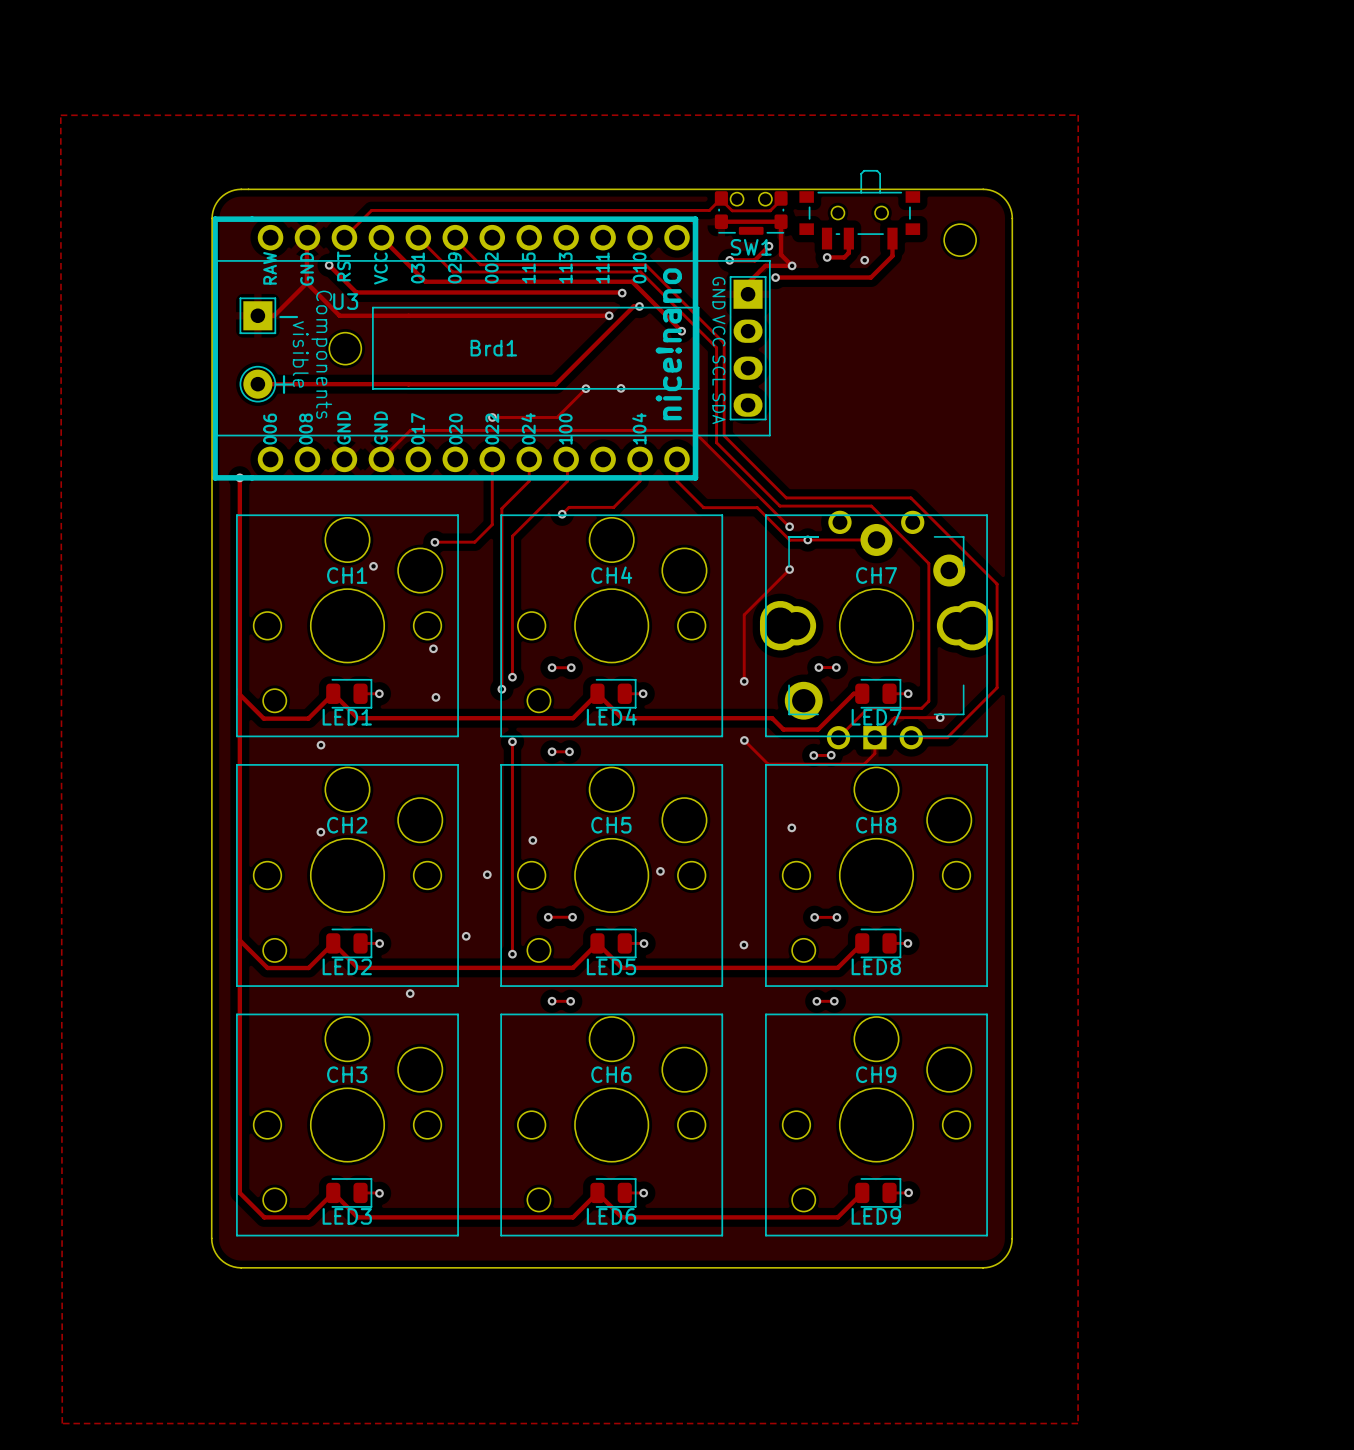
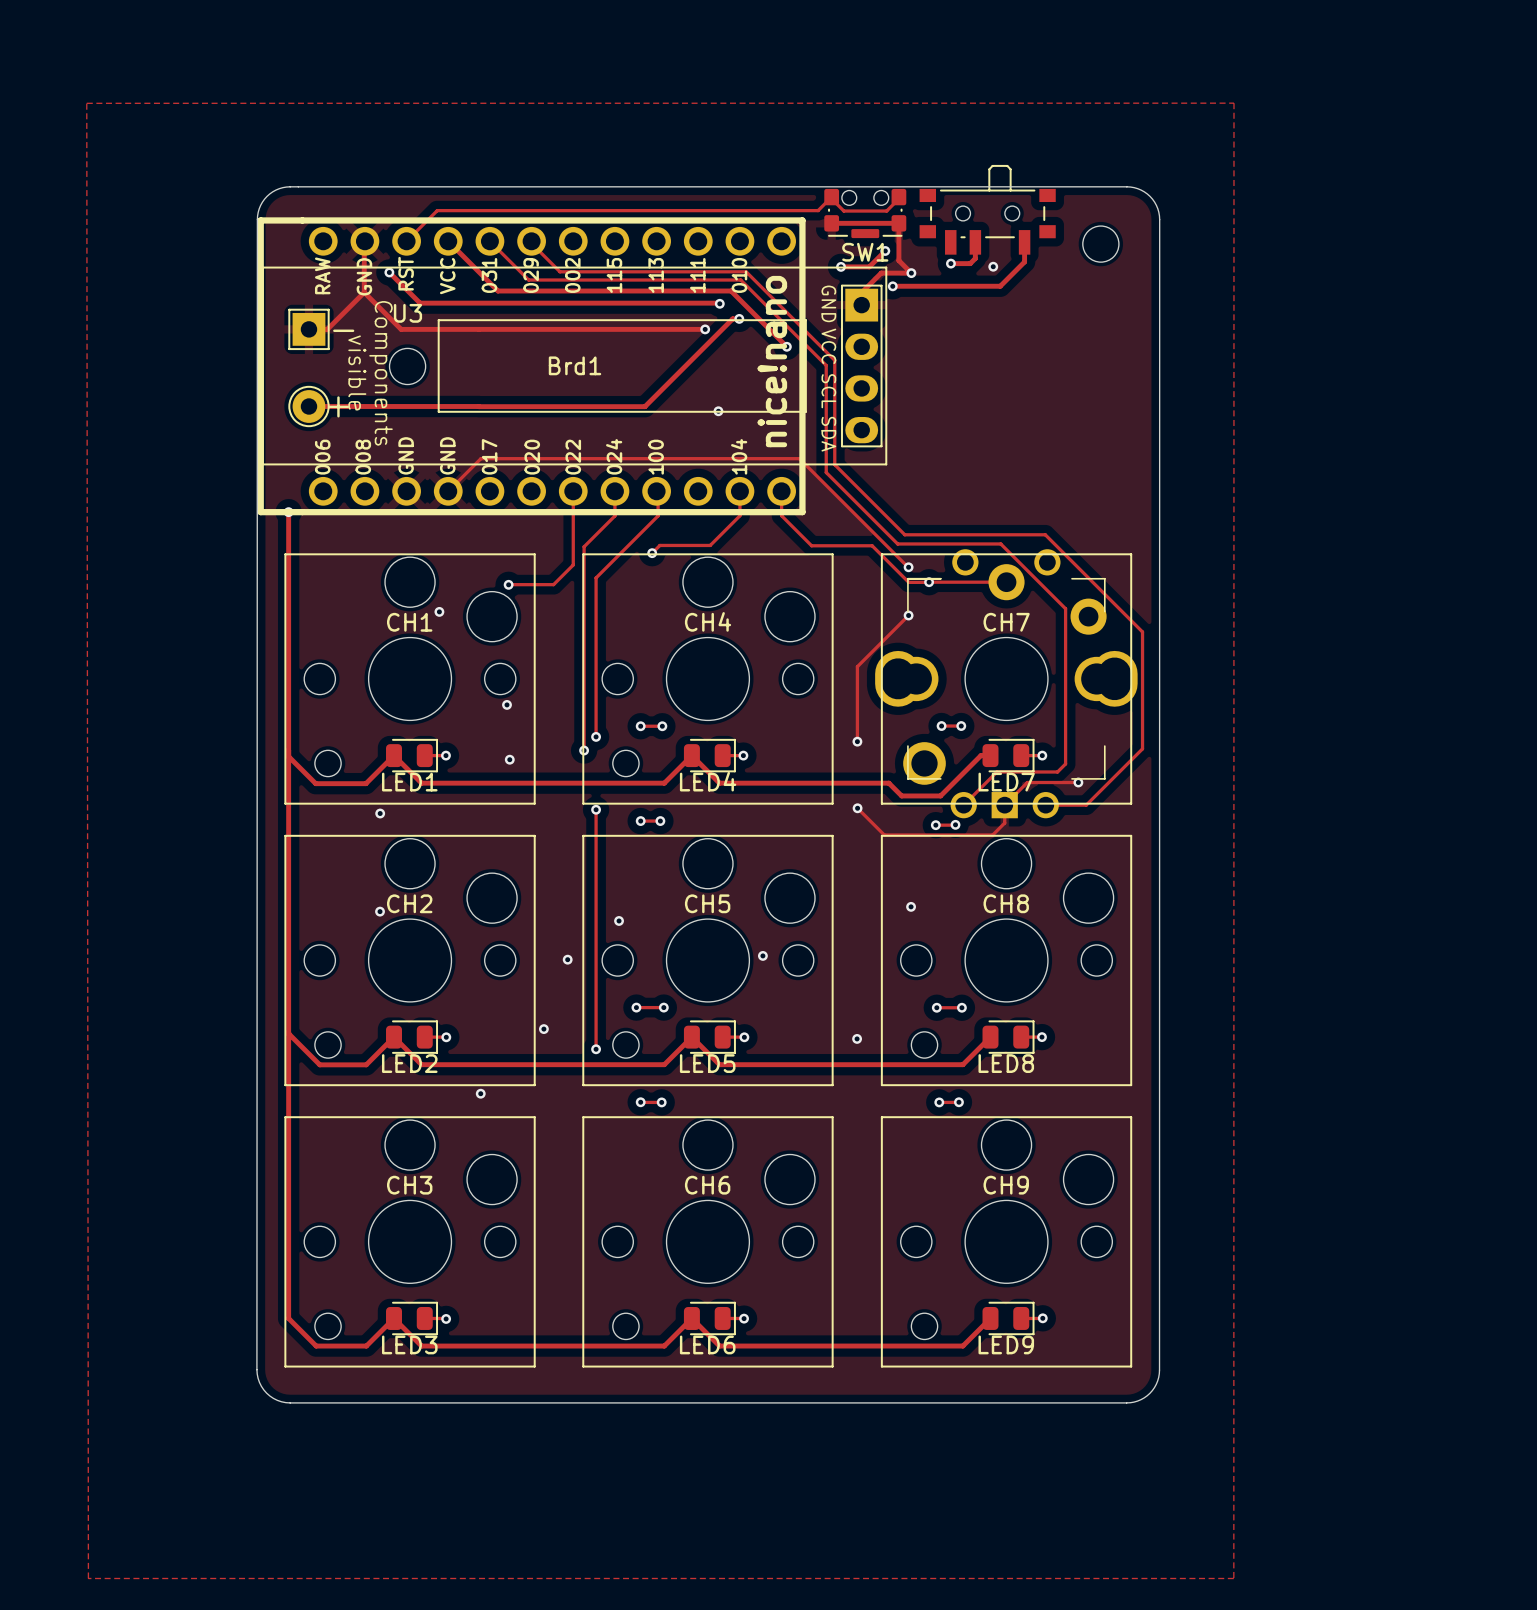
track: (585, 388) (557, 417) (492, 417) -> none
via: (585, 388) -> none
via: (492, 417) -> none

